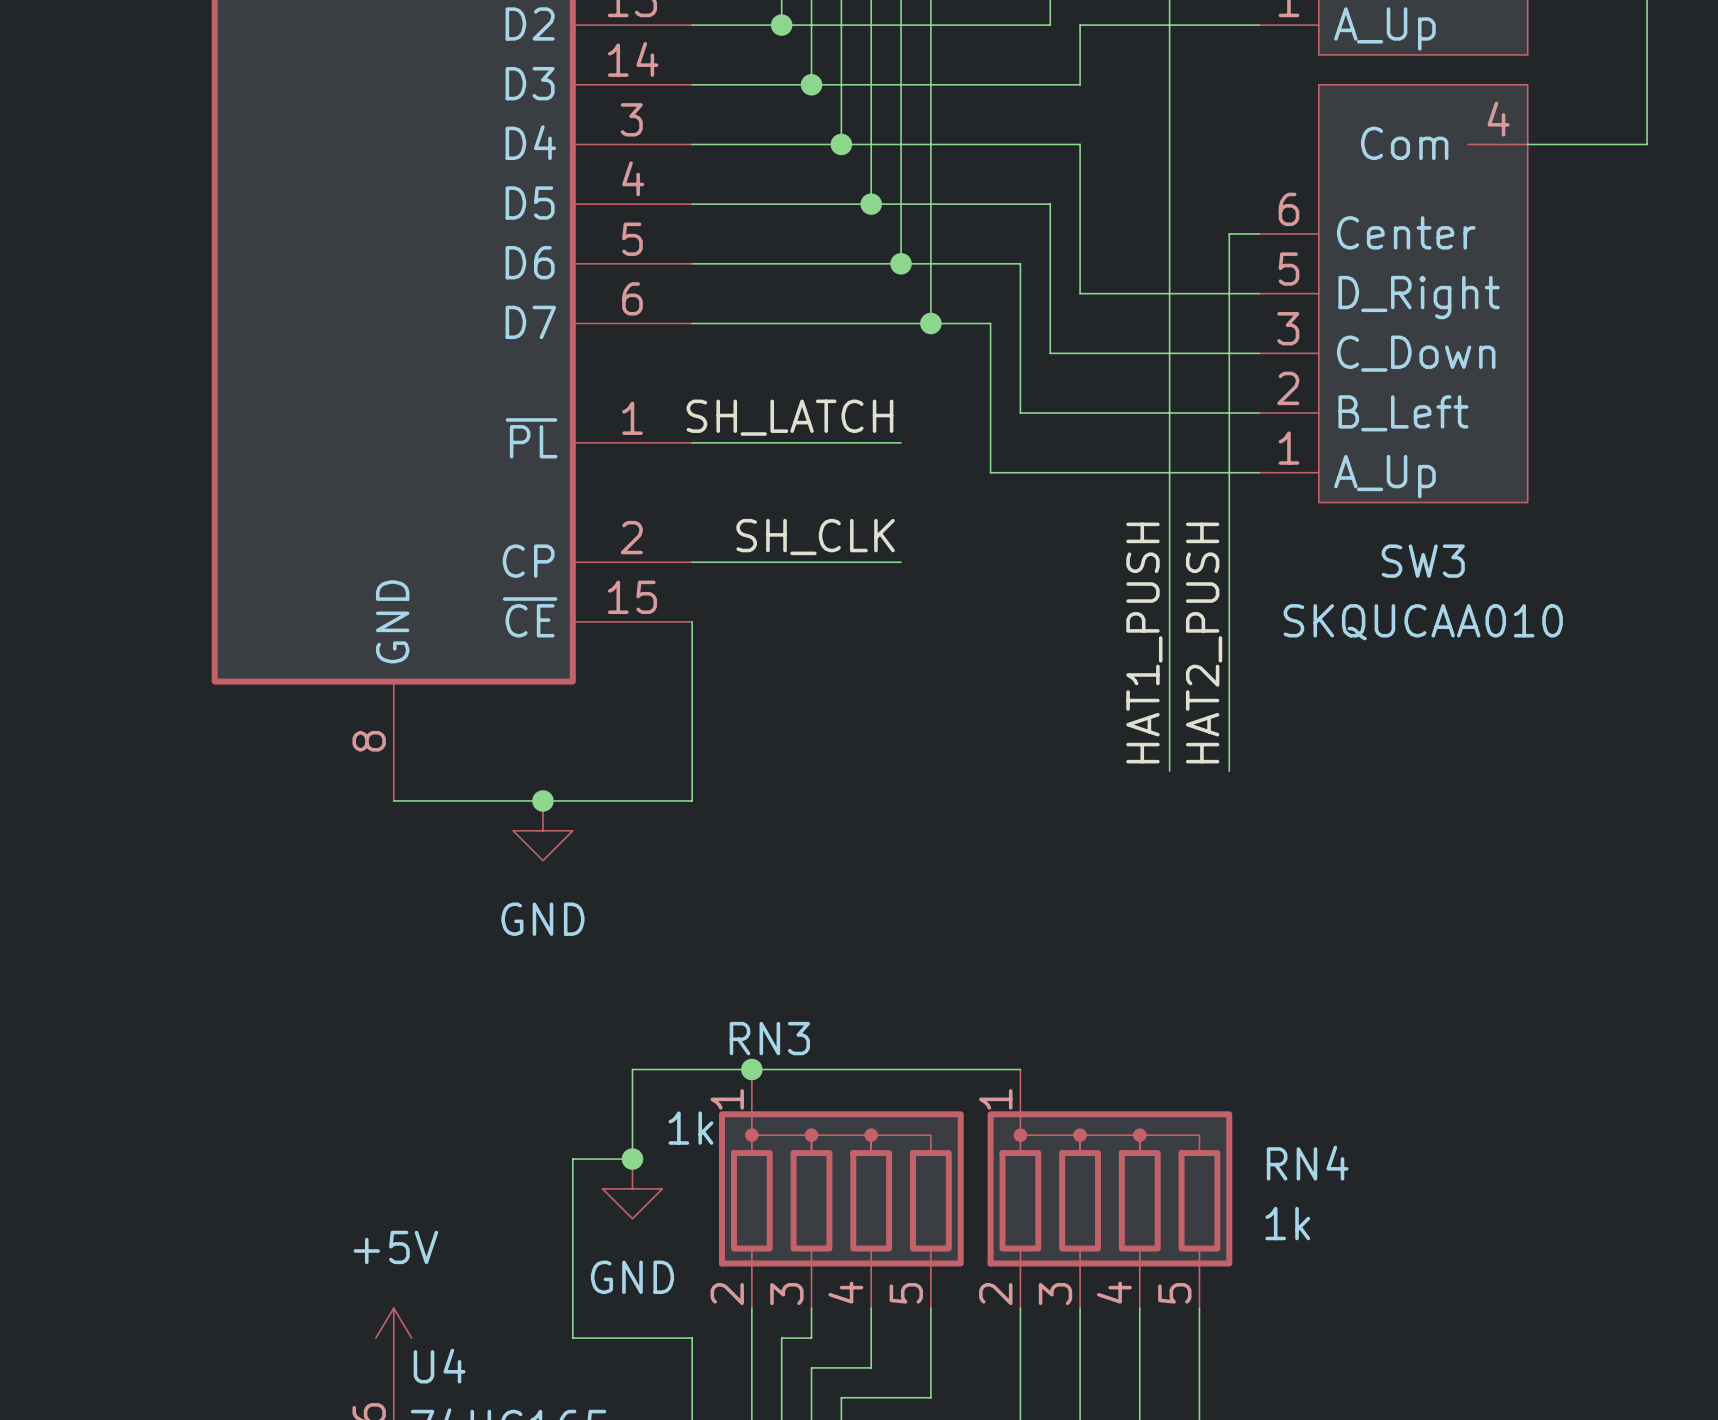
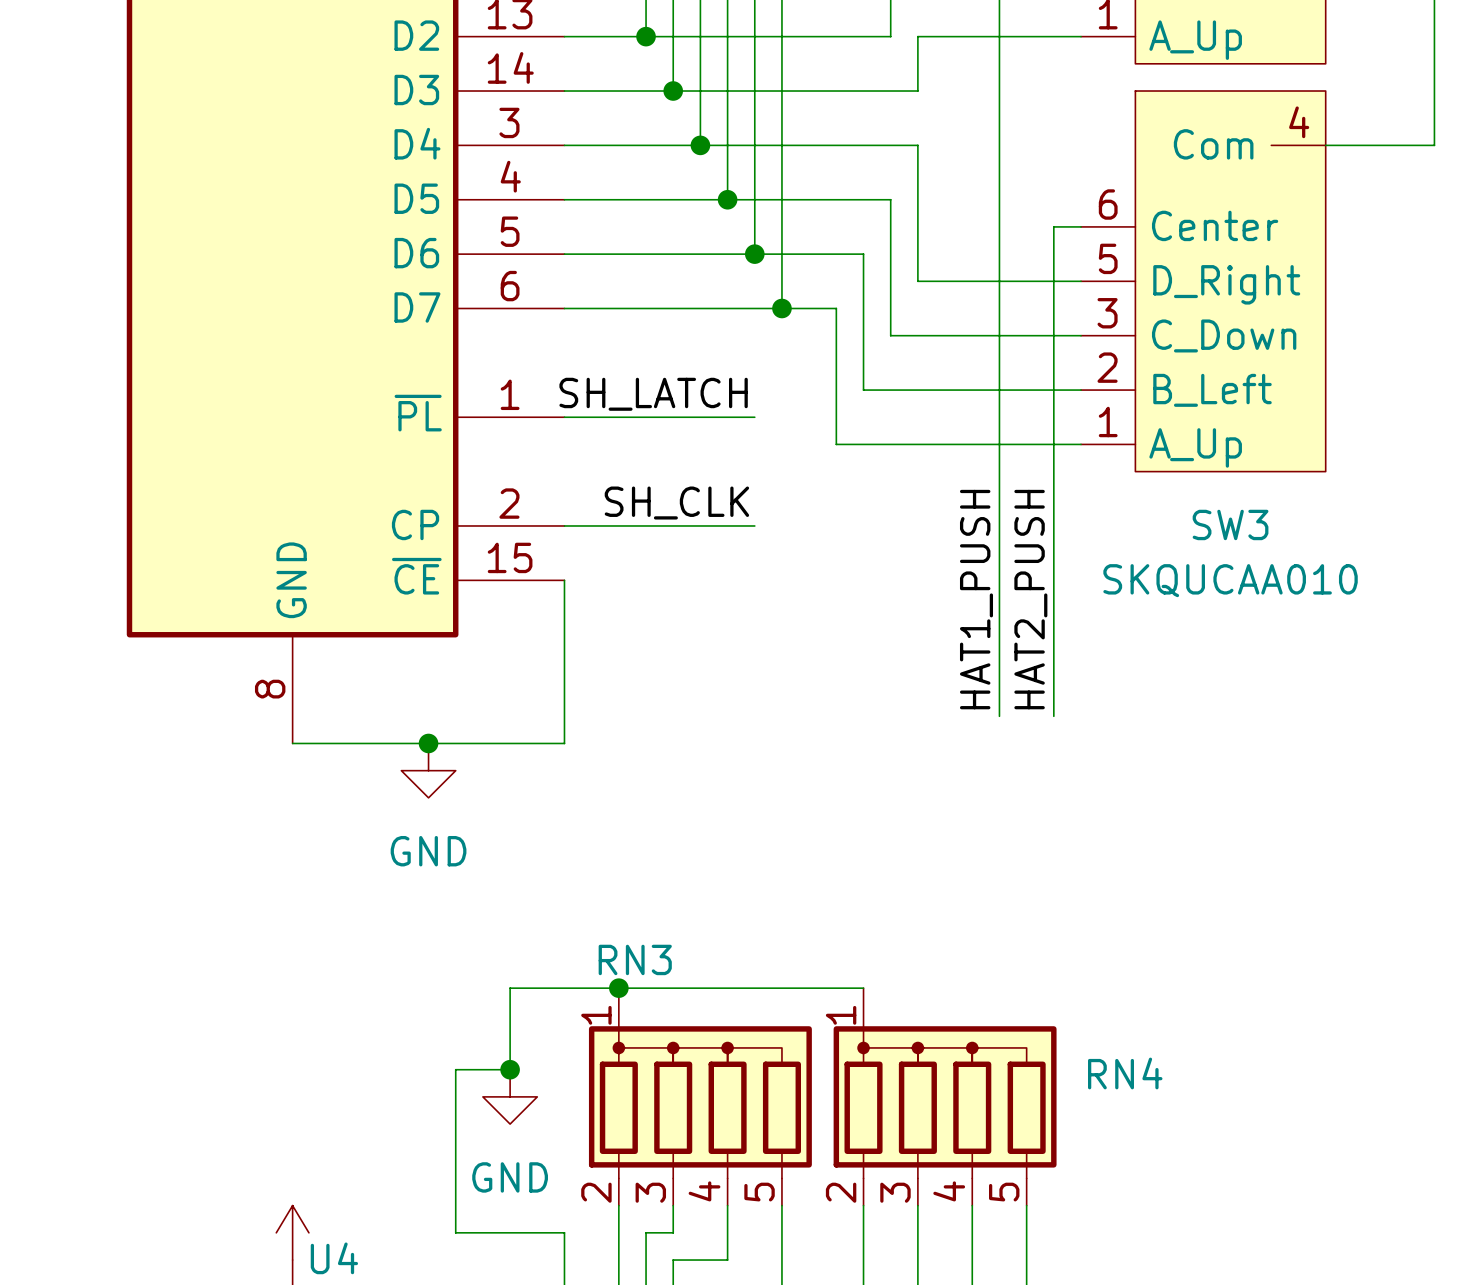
RN3 value: 1k (690, 1128) -> none
RN4 value: 1k (1287, 1223) -> none
power symbol text: +5V (395, 1247) -> none

